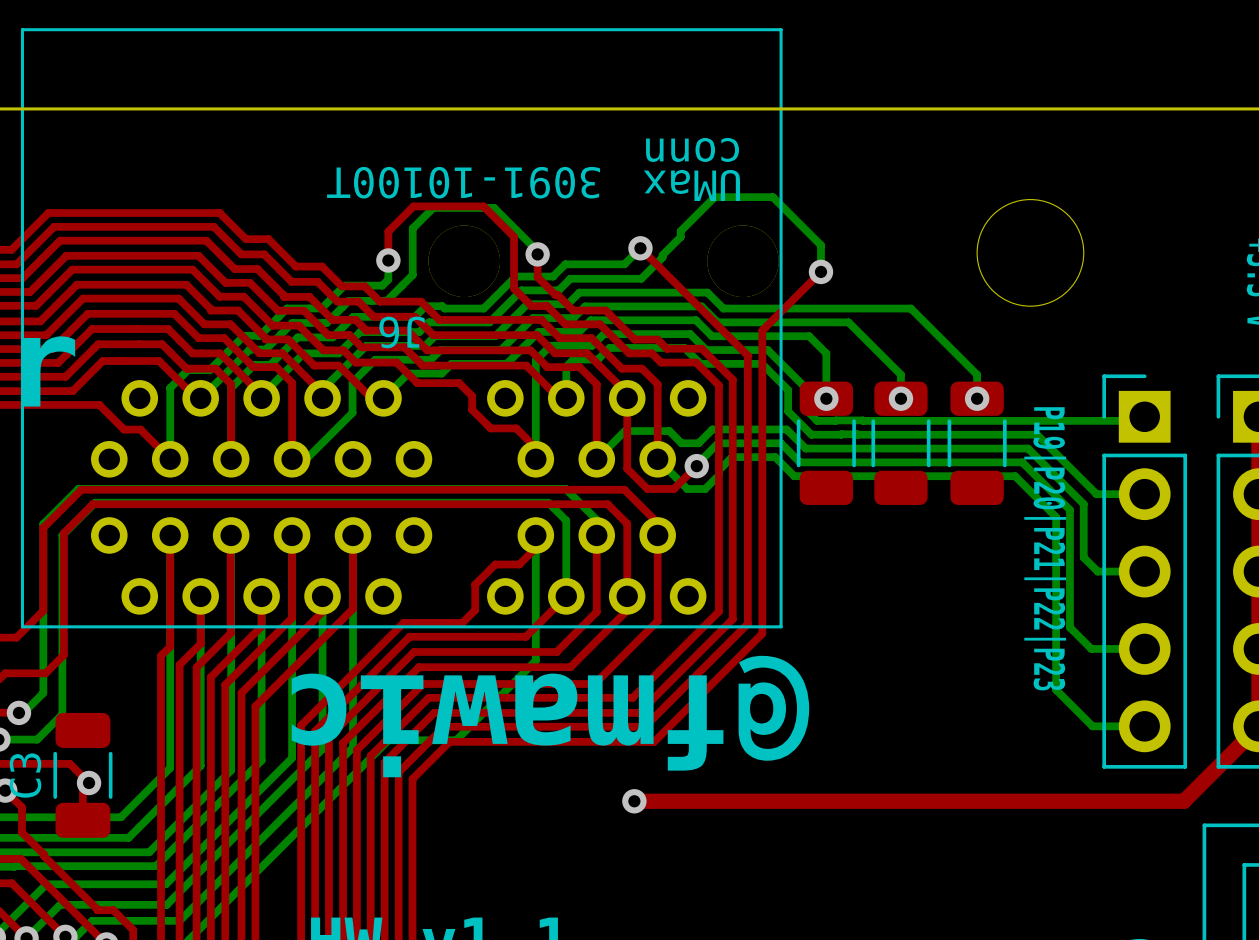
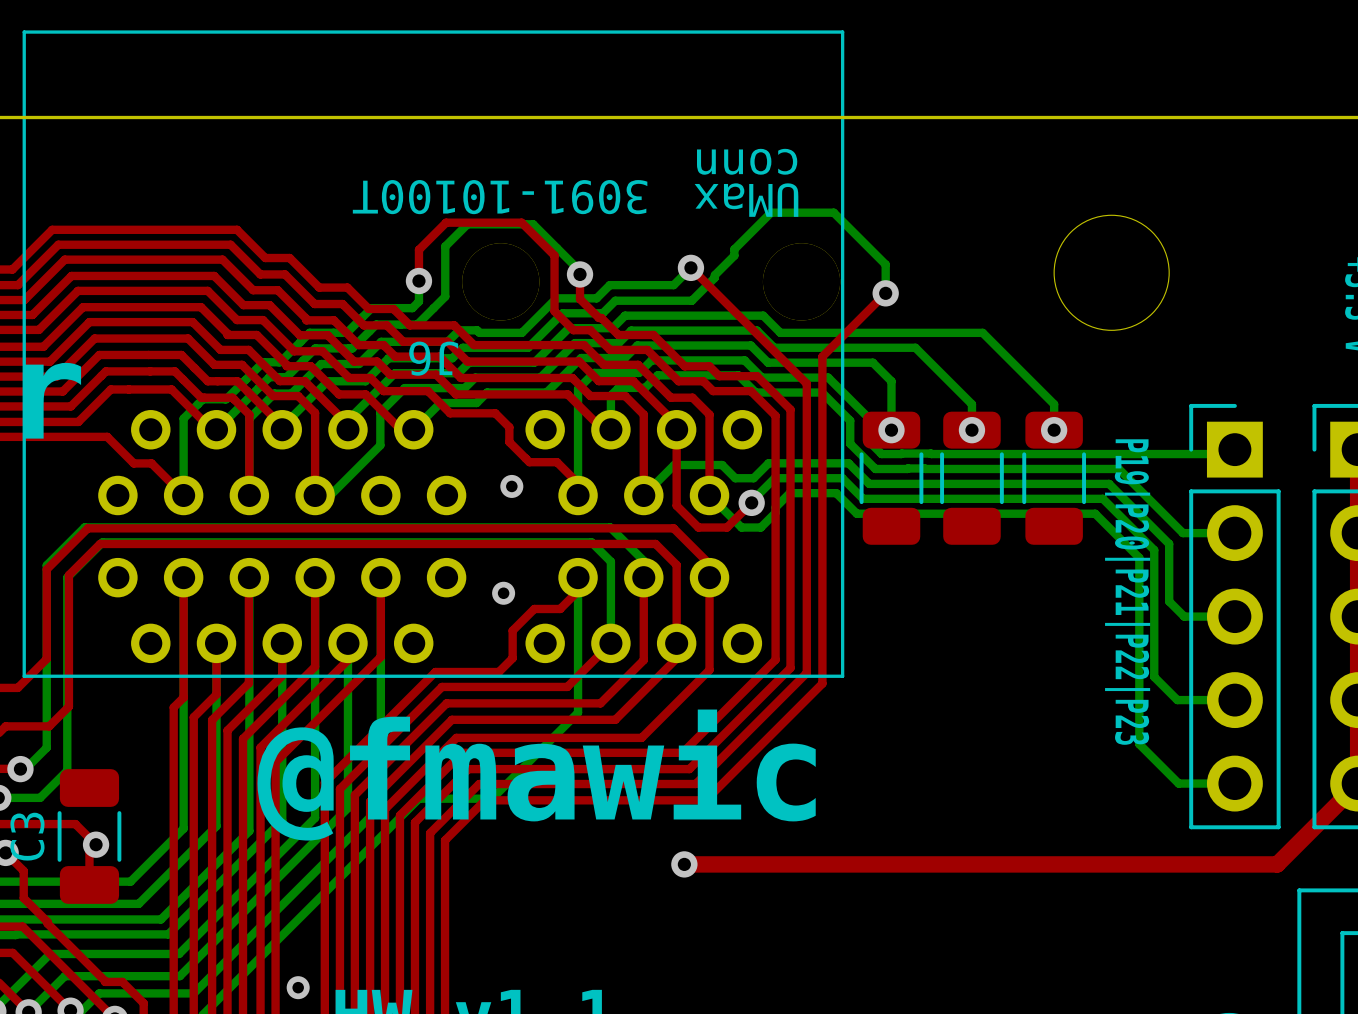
via: none -> (511, 486)
via: none -> (503, 593)
text rotation: 0° (550, 716) -> 180° (536, 775)
via: none -> (298, 987)

